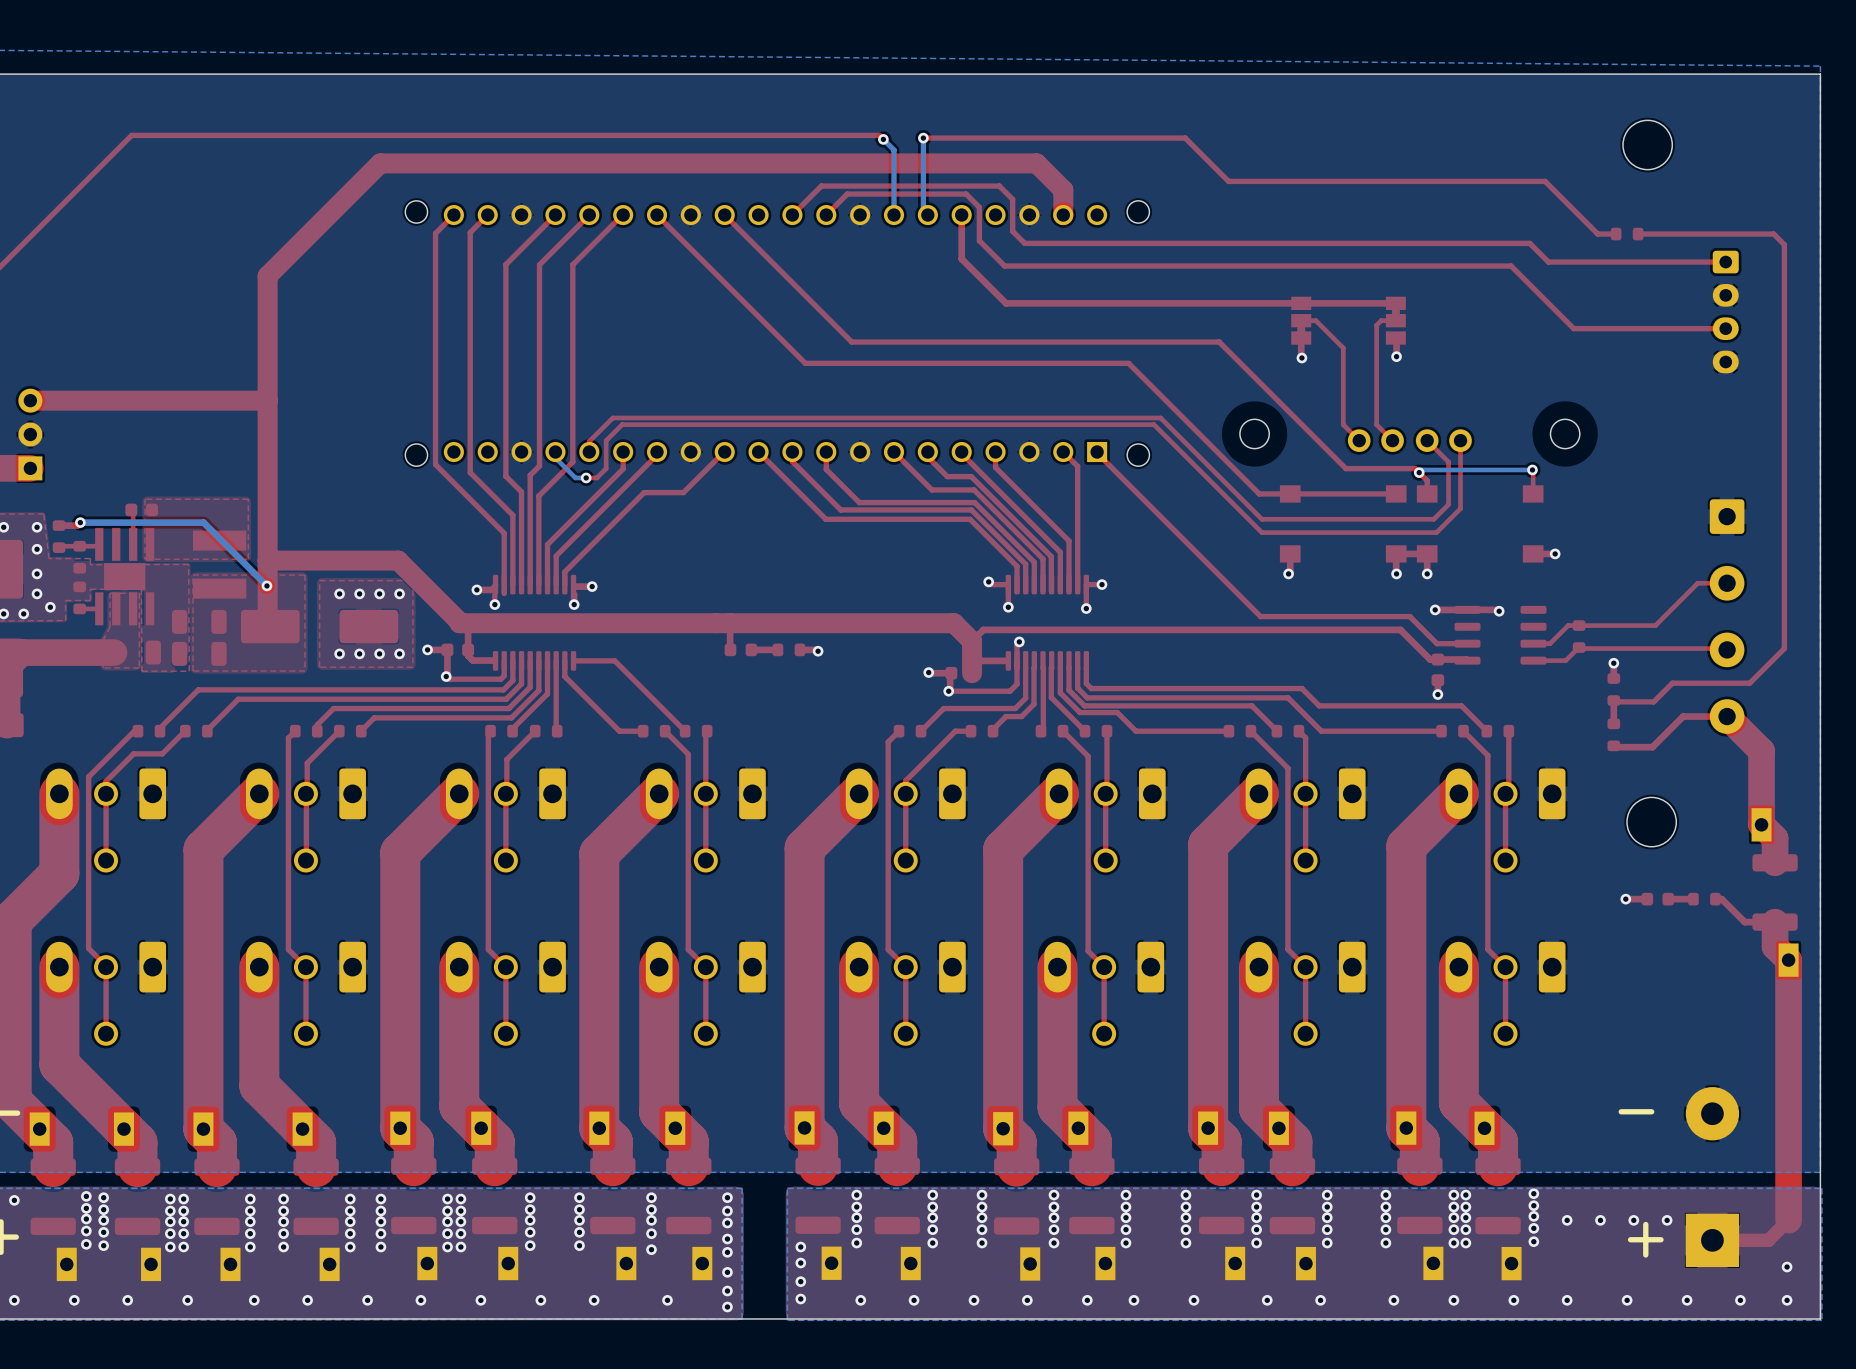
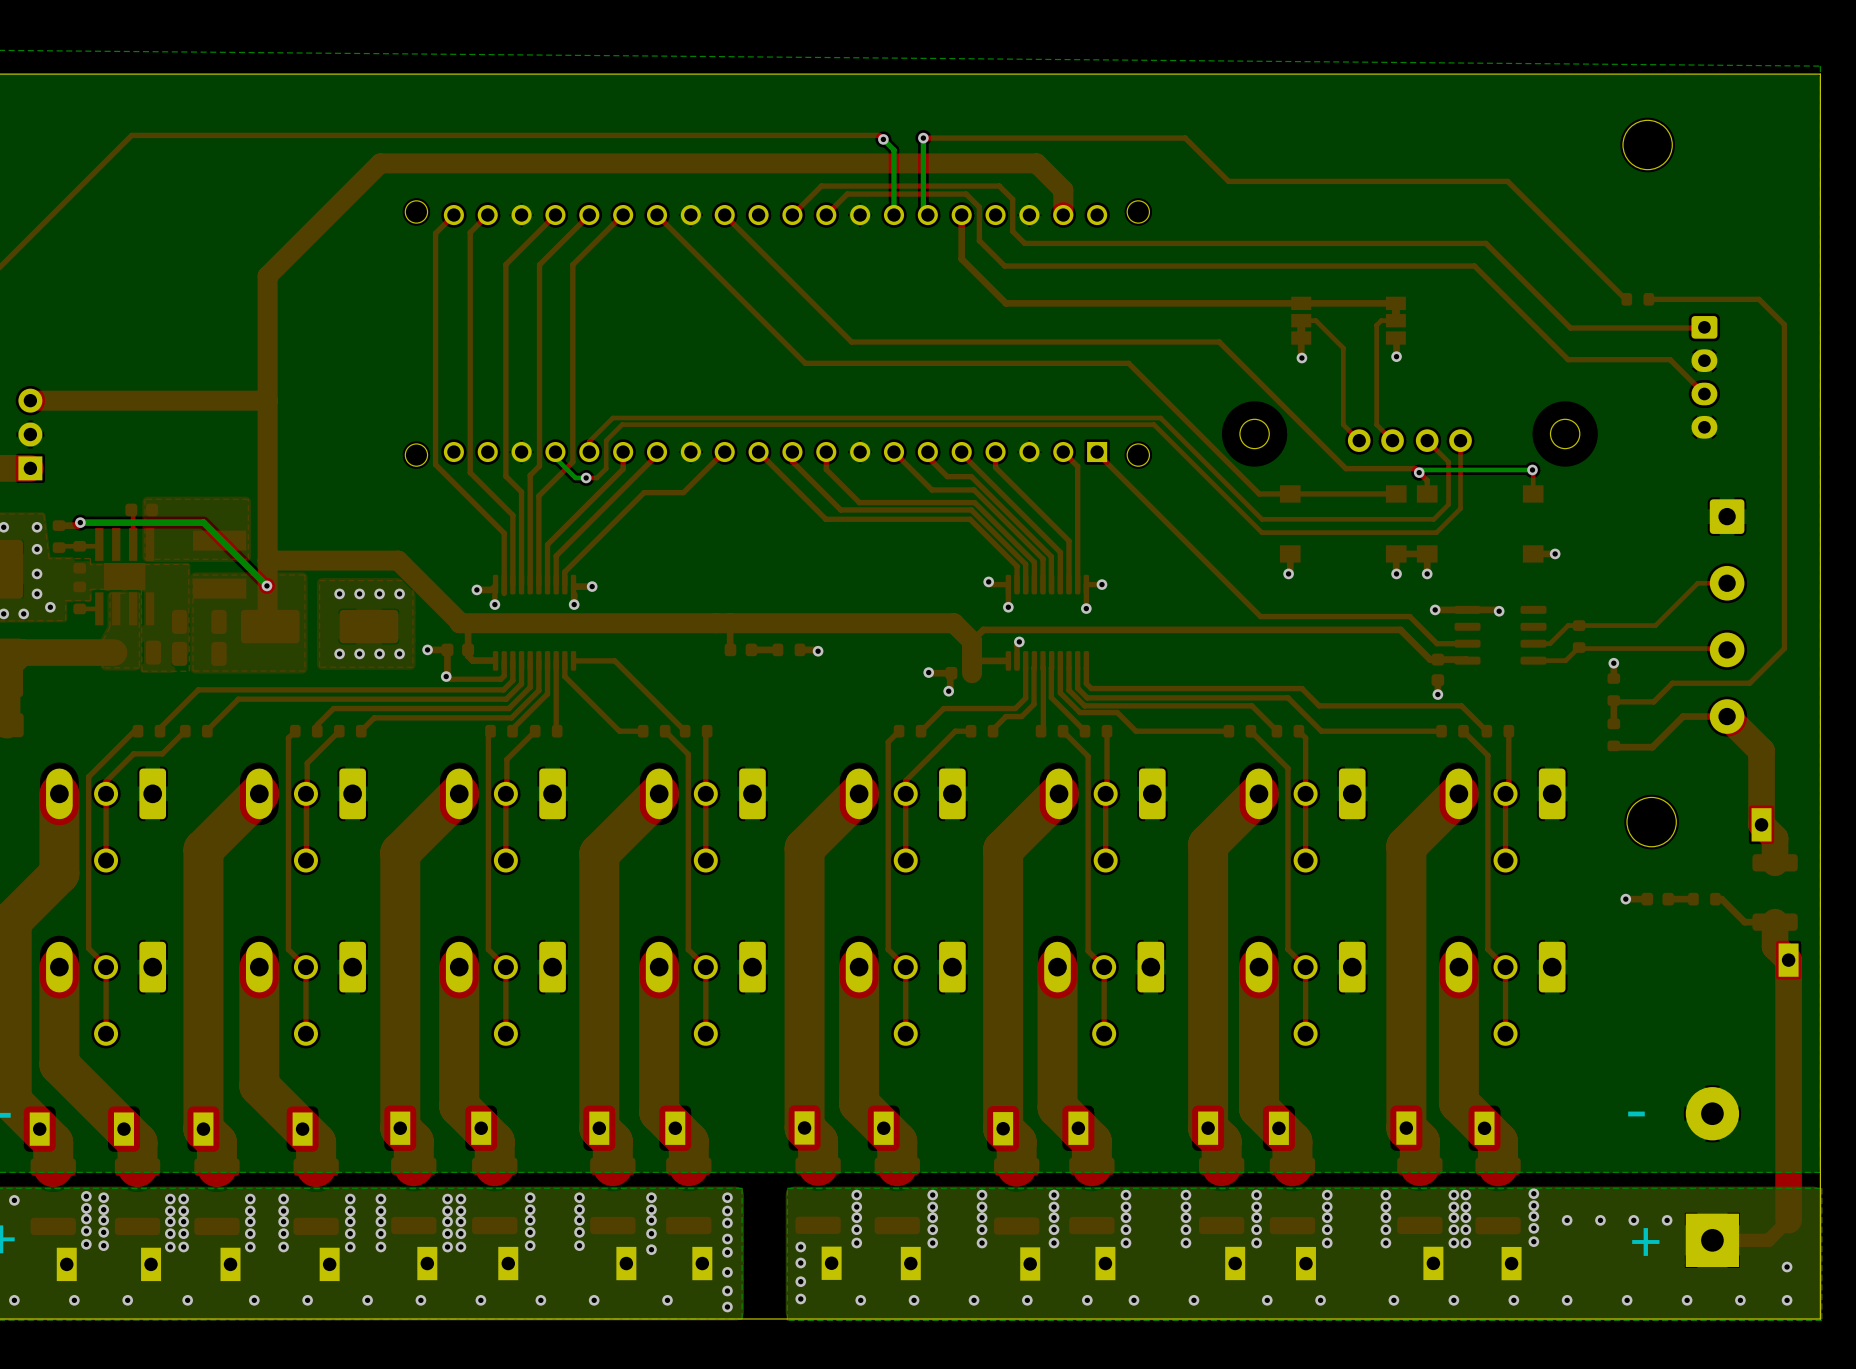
top track: (1507, 181) (1545, 181) (1597, 234) (1616, 234) -> (1507, 181) (1625, 299)
part position: (1627, 234) -> (1637, 299)
top track: (1638, 234) (1773, 234) (1784, 244) (1784, 324) -> (1651, 301) (1653, 299) (1759, 299) (1784, 324)
top track: (1485, 243) (1529, 243) (1548, 262) (1725, 262) -> (1485, 243) (1570, 328) (1704, 327) (1699, 327)
top track: (1474, 266) (1511, 266) (1573, 328) (1725, 328) -> (1474, 266) (1568, 359) (1670, 359) (1704, 395)
part position: (1725, 312) -> (1704, 377)
top track: (1017, 667) (1017, 684) (1010, 691) (948, 691) -> none

